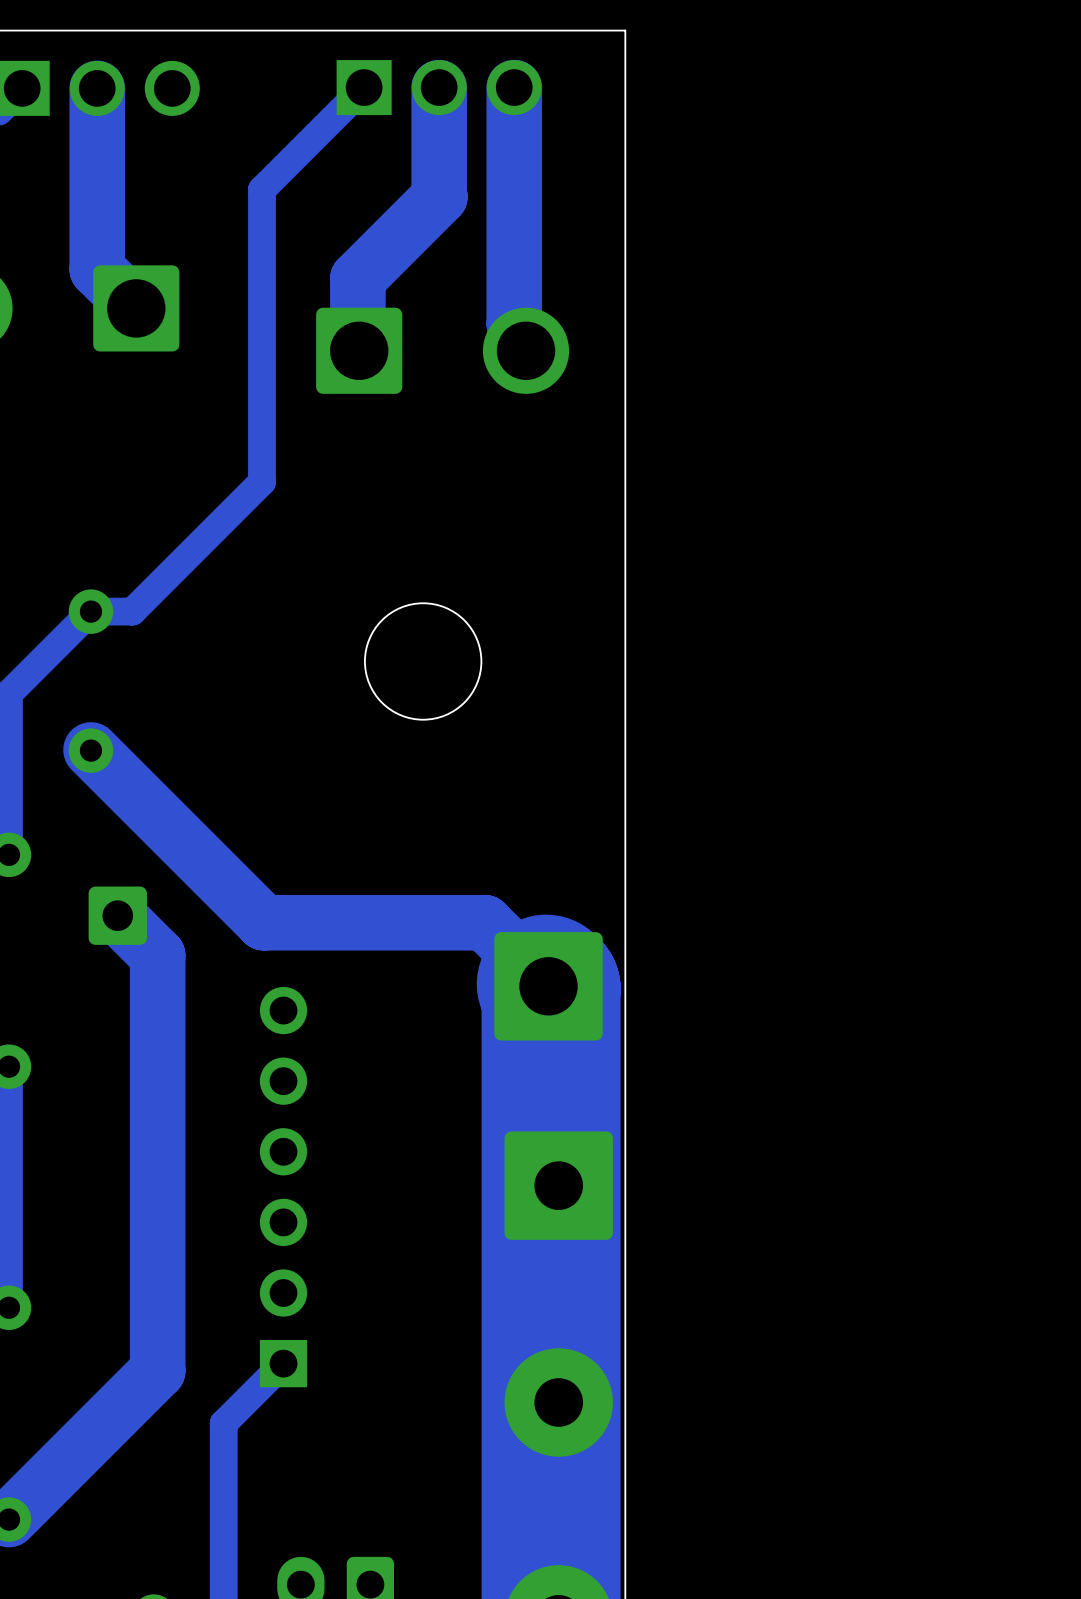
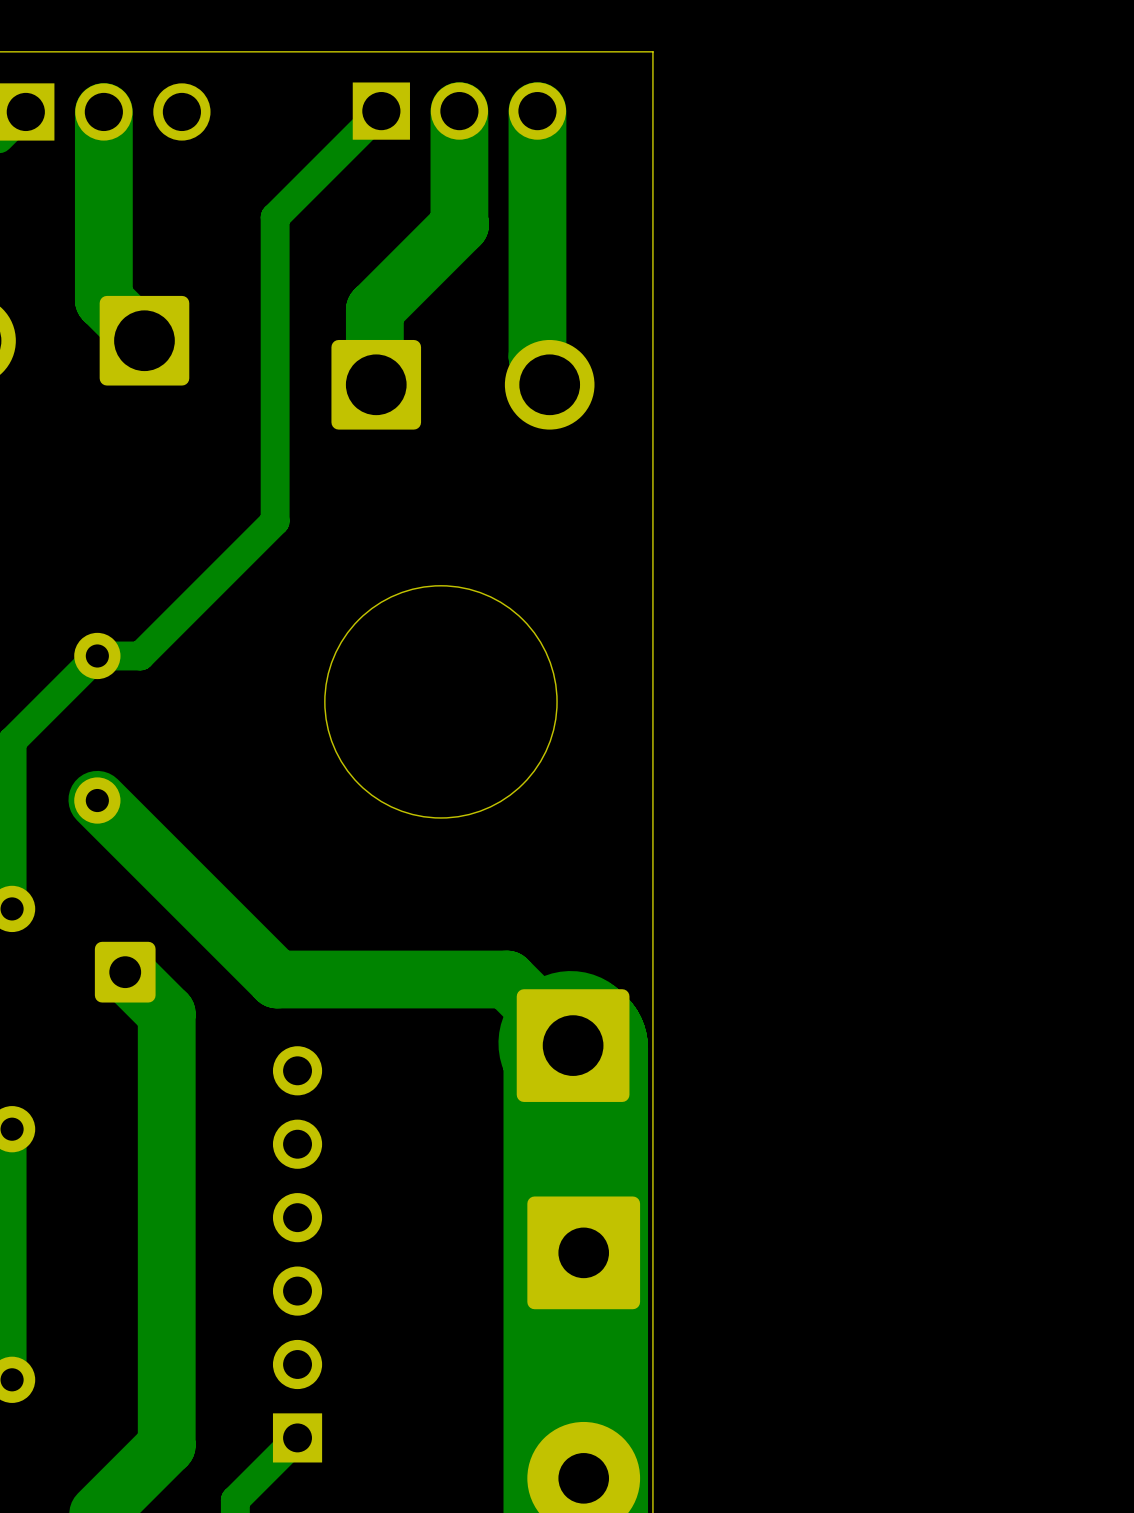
round board edge size: [364, 602, 483, 721] -> [324, 585, 558, 819]

